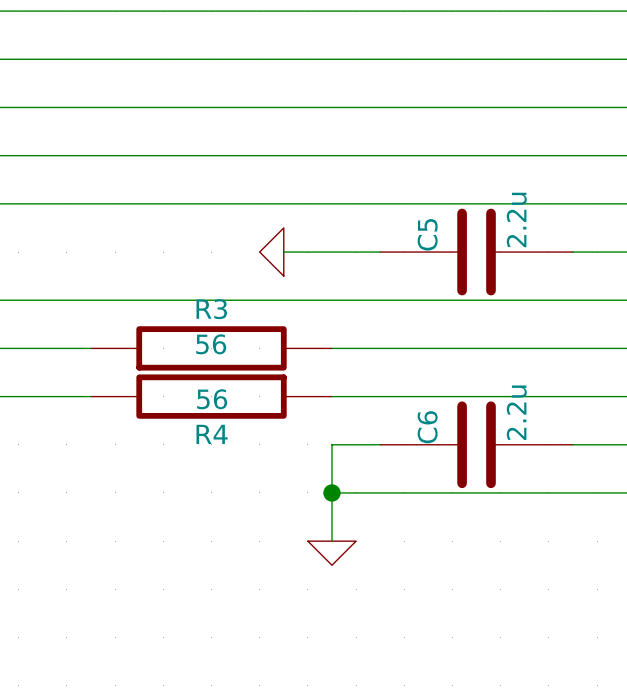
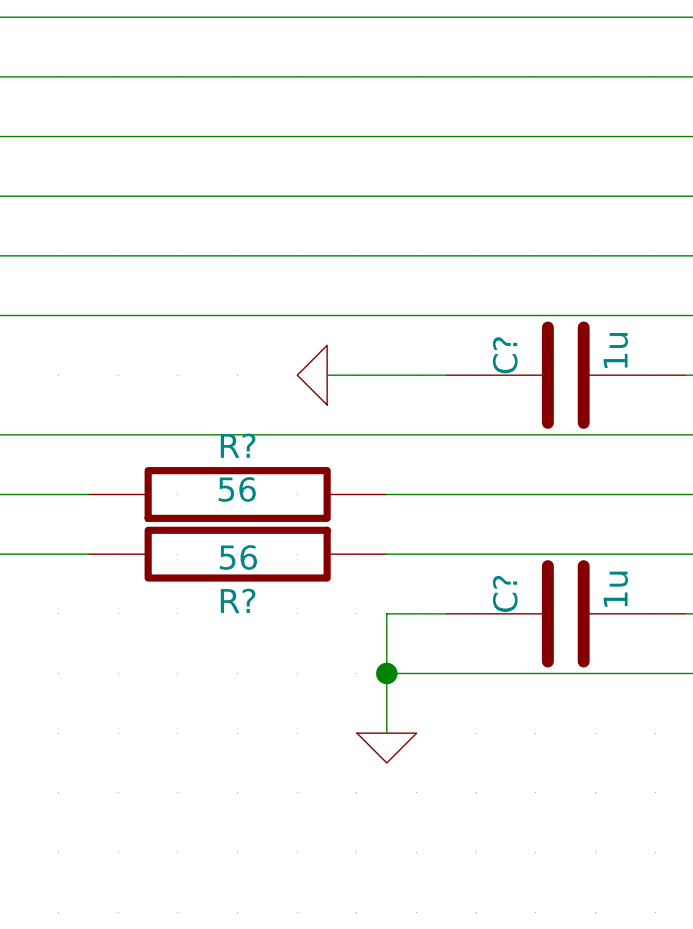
C5 value: 2.2u (516, 219) -> 1u (615, 350)
C5 name: C5 (427, 234) -> C? (505, 355)
R3 name: R3 (211, 309) -> R? (238, 445)
C6 value: 2.2u (516, 412) -> 1u (615, 589)
C6 name: C6 (427, 427) -> C? (505, 593)
R4 name: R4 (212, 434) -> R? (238, 600)

